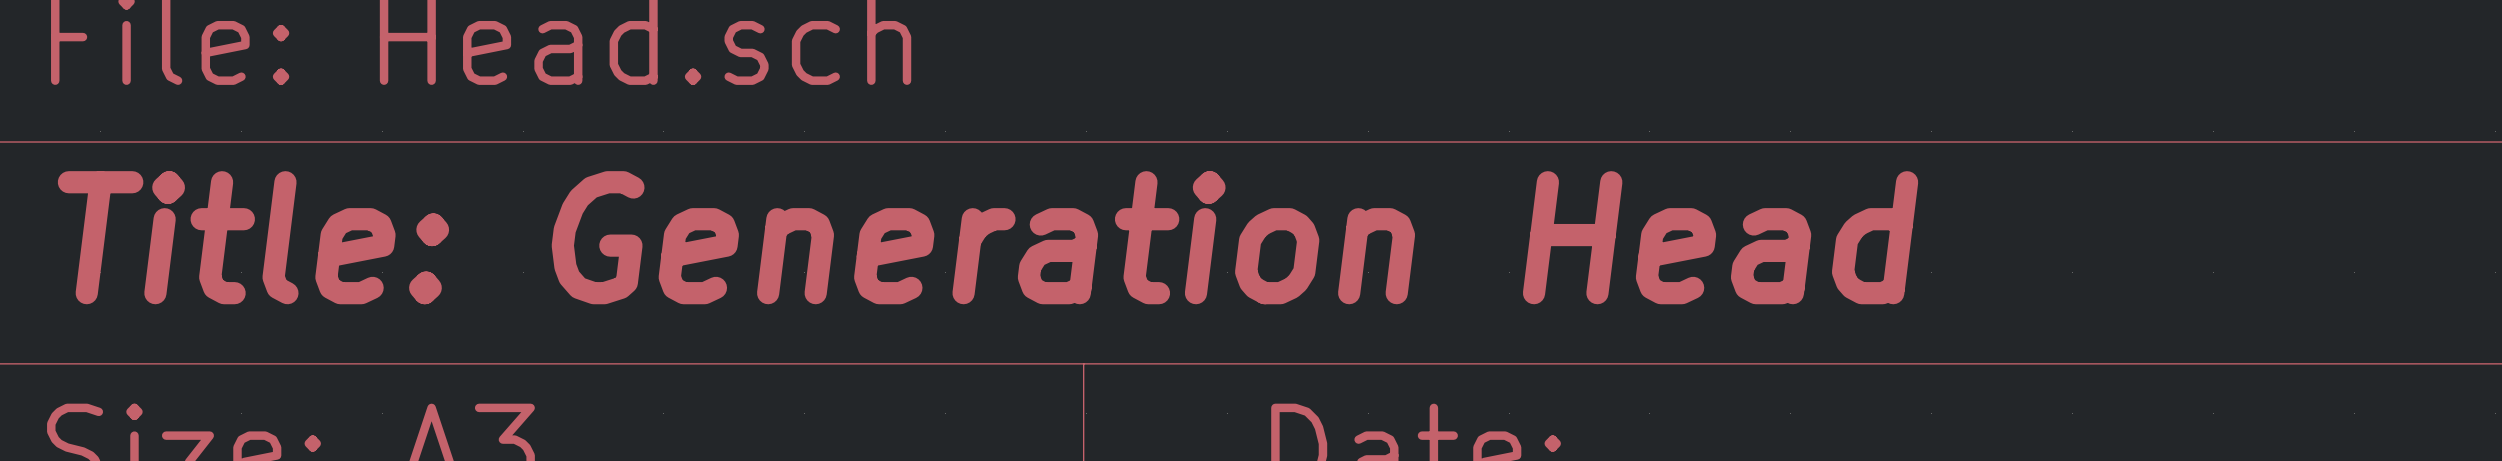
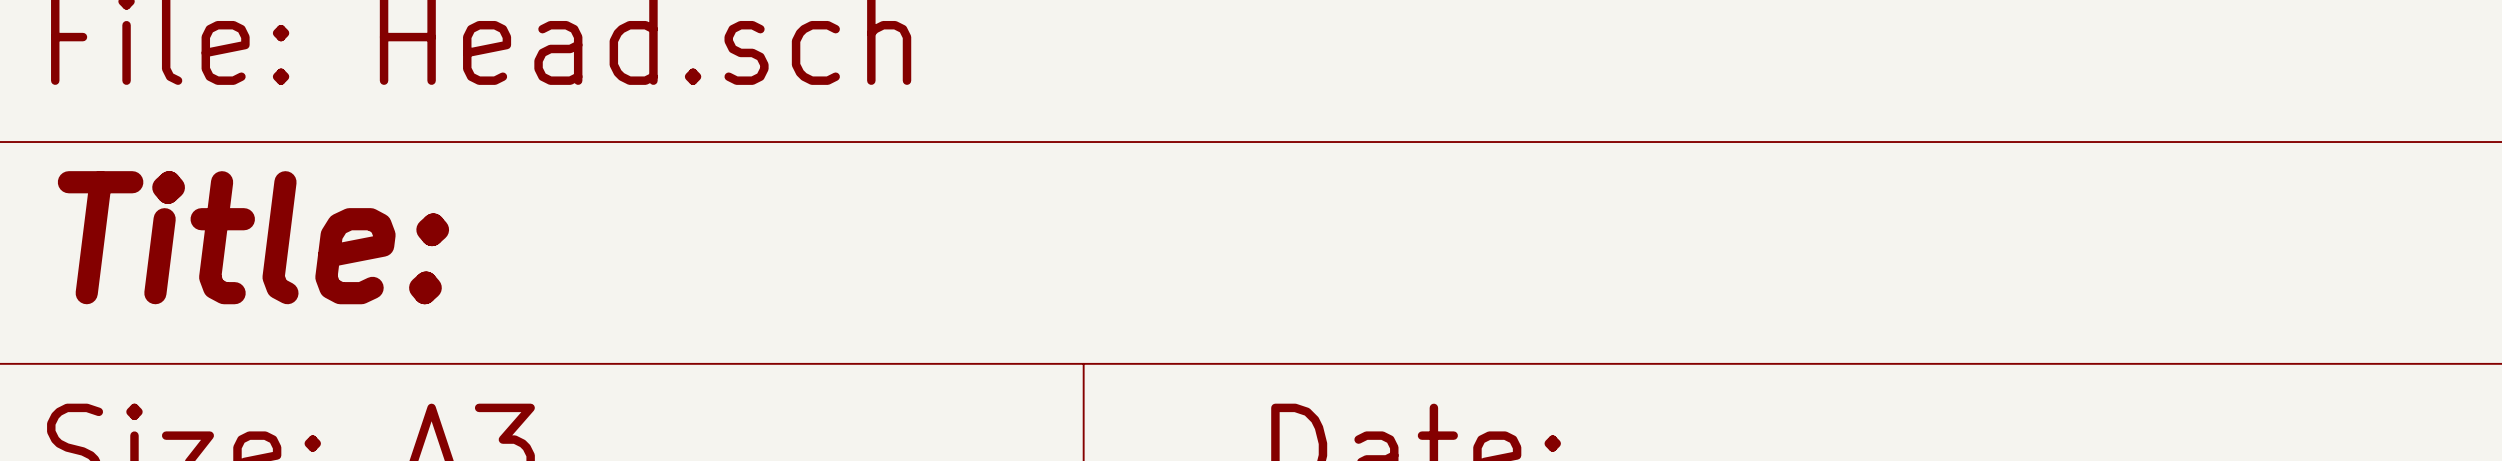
title block: Title: Generation Head (988, 237) -> Title: (253, 237)

